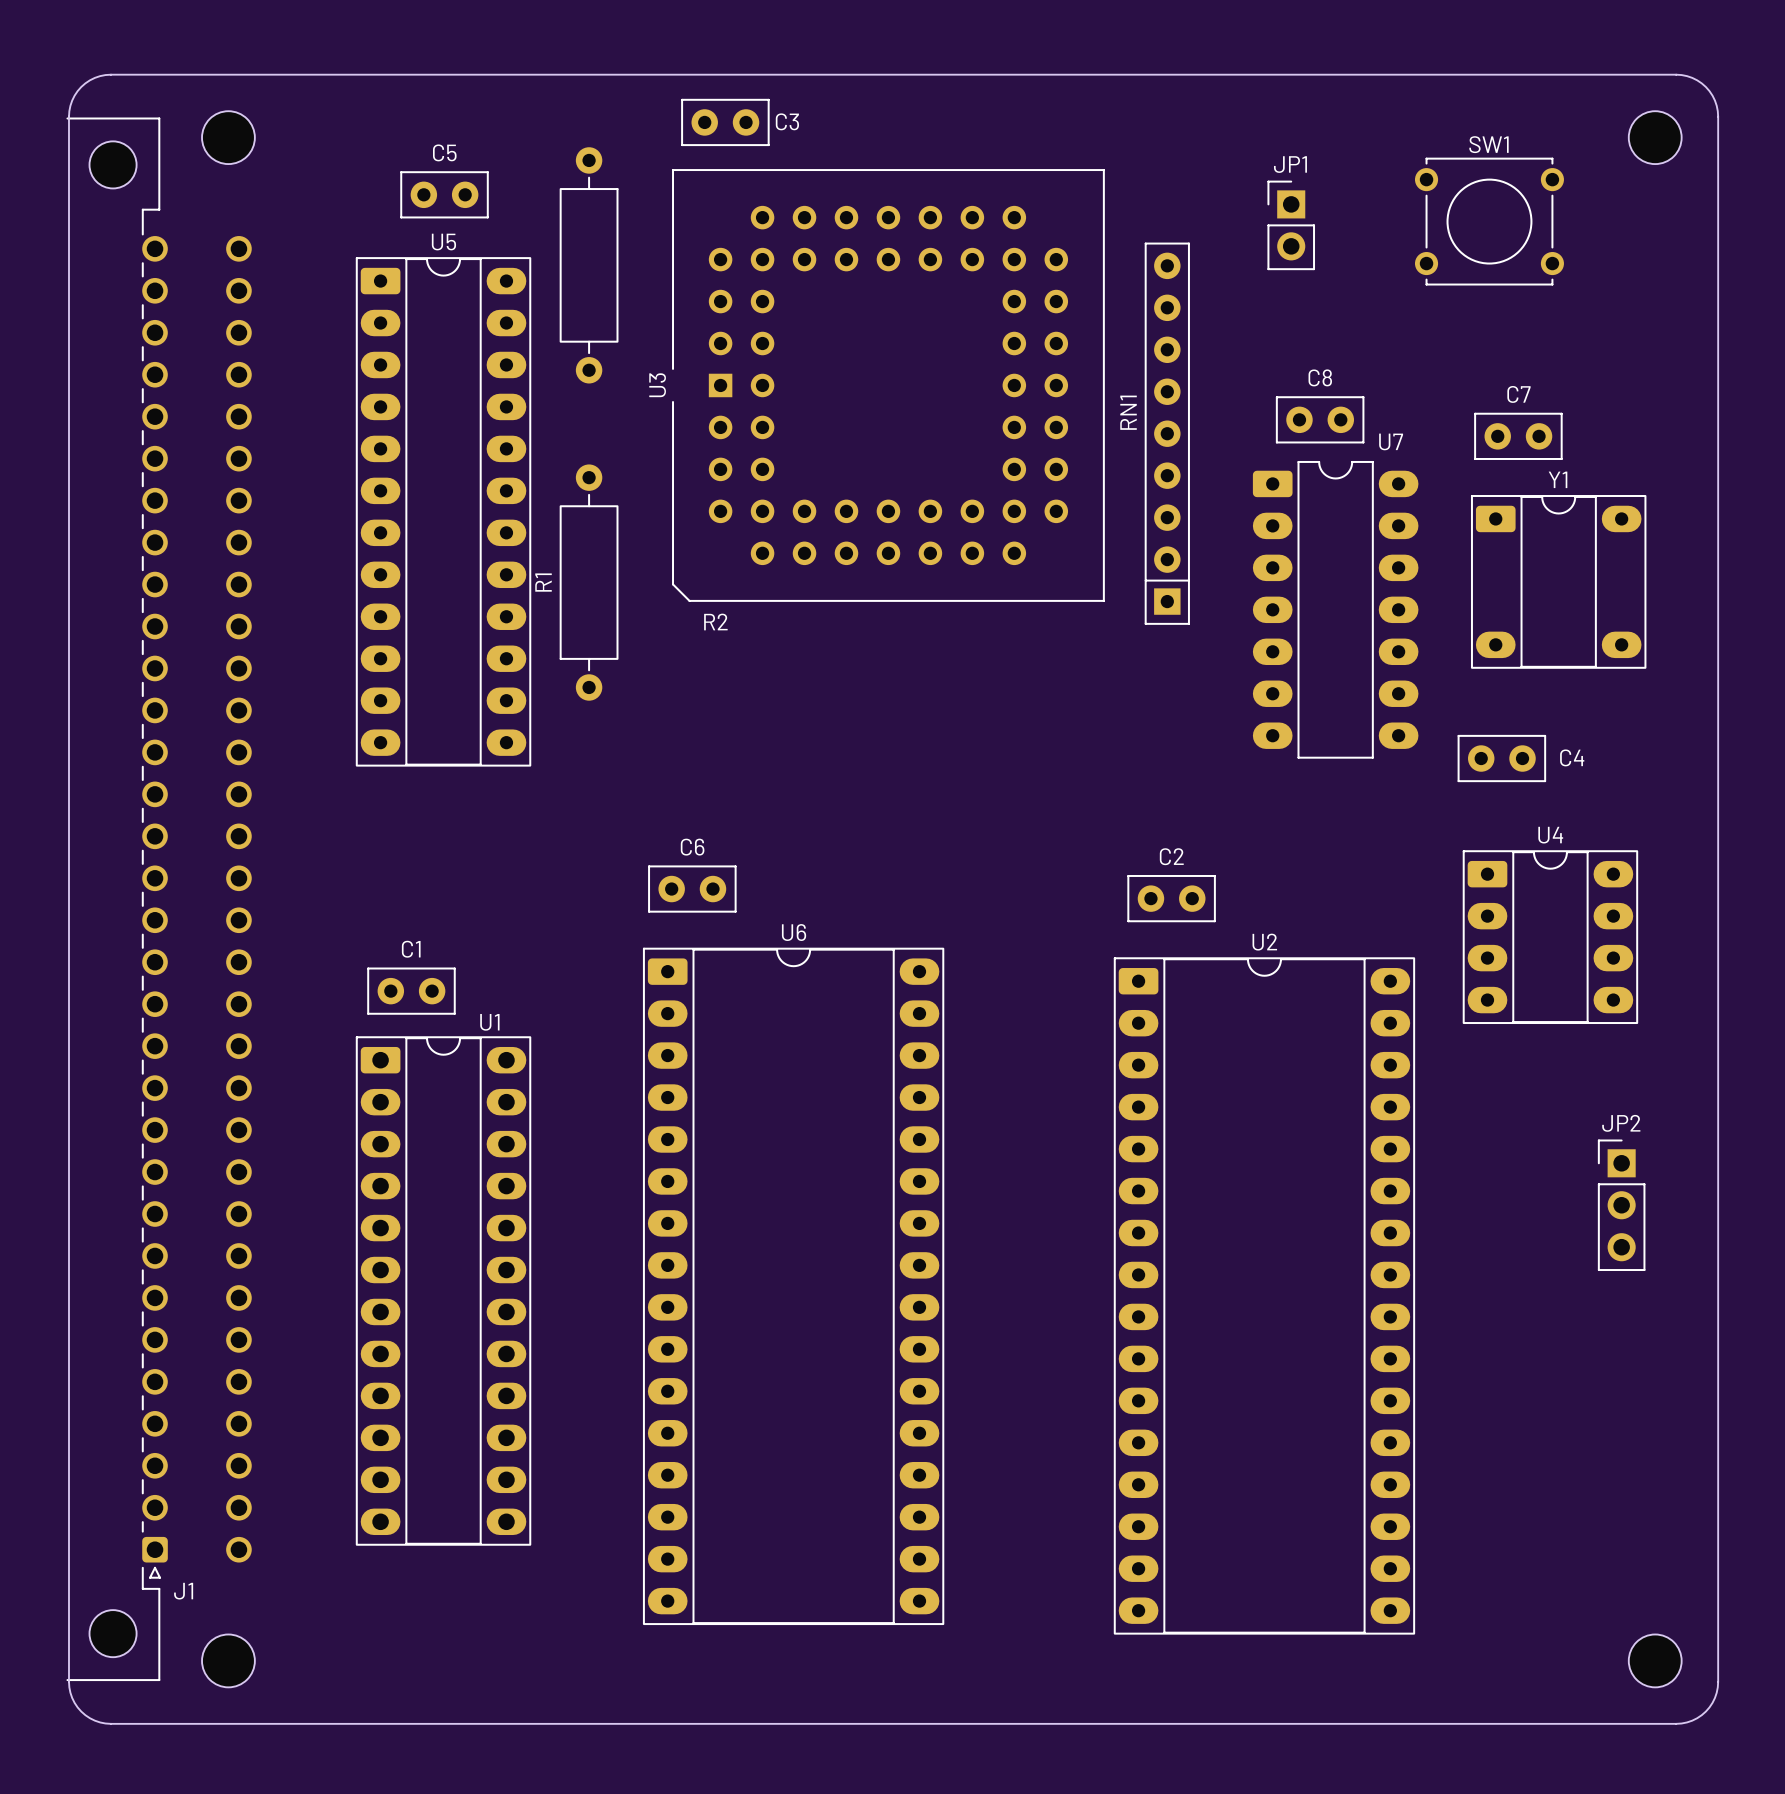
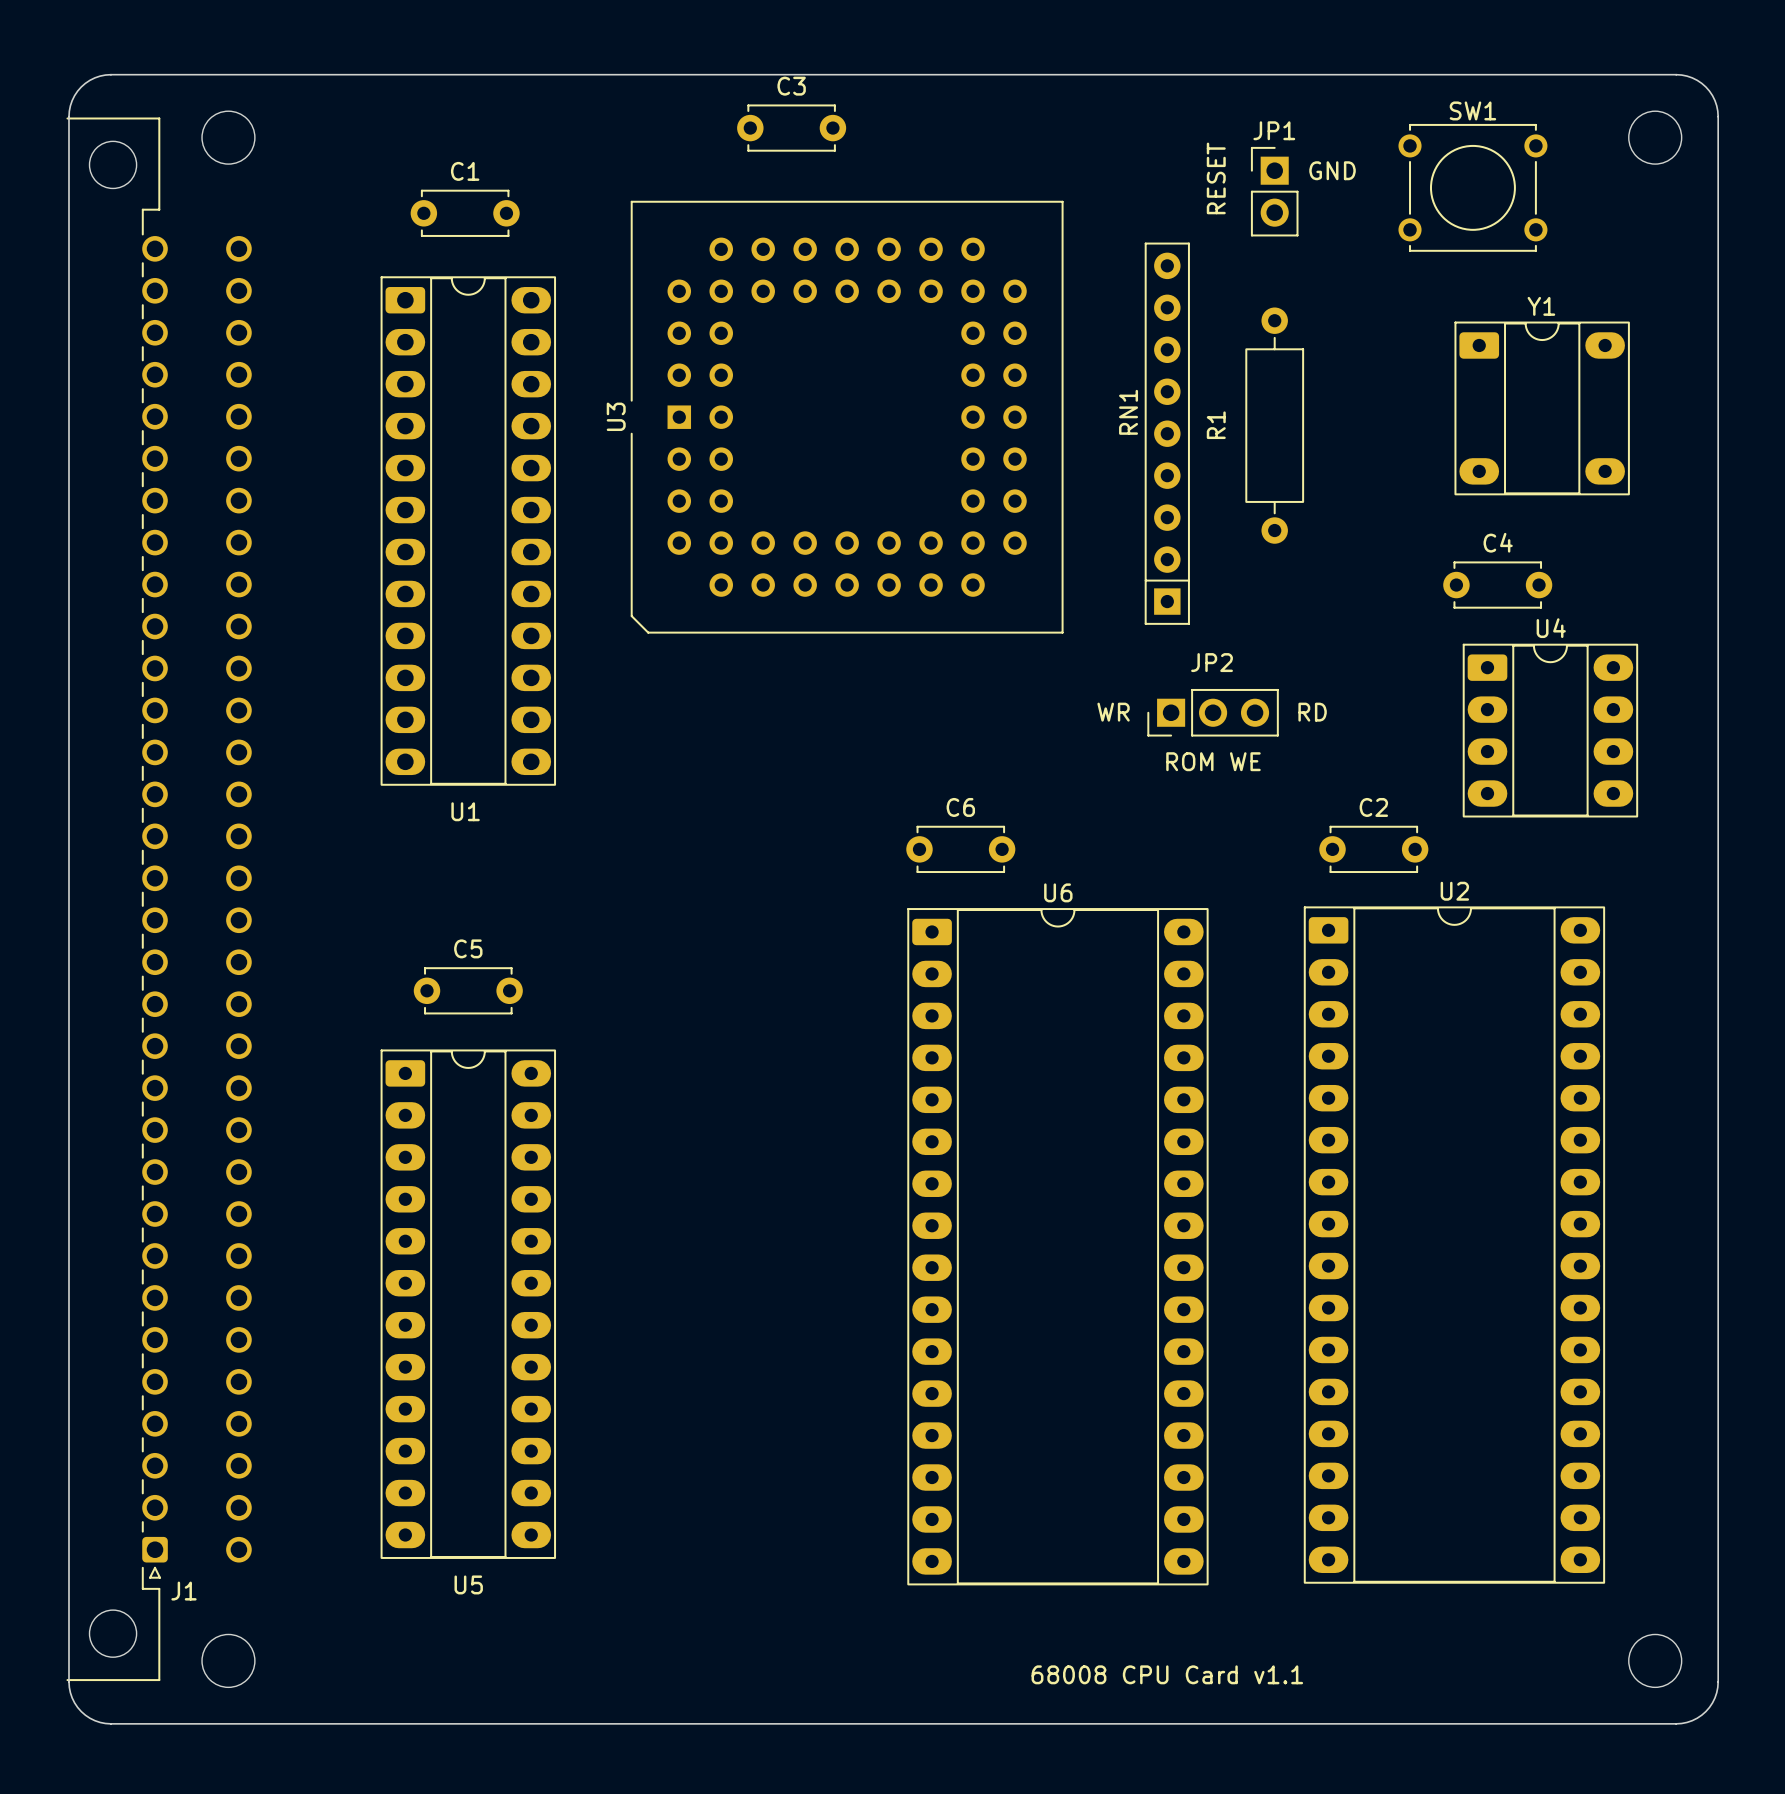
C3 footprint: [681, 98, 770, 147] -> [737, 104, 847, 152]
C3 name position: C3 (787, 121) -> C3 (791, 86)
text: none -> GND (1332, 170)
C5 footprint: [400, 171, 489, 219] -> [413, 967, 523, 1015]
text: none -> RESET (1216, 178)
SW1 position: (1489, 221) -> (1472, 187)
JP1 position: (1291, 225) -> (1274, 191)
U5 name position: U5 (443, 242) -> U5 (468, 1584)
R2: (589, 265) -> none
U3 position: (888, 385) -> (847, 417)
C8: (1320, 419) -> none
C7: (1518, 436) -> none
U5 position: (443, 511) -> (468, 1304)
Y1 position: (1558, 581) -> (1542, 408)
R1 name position: R1 (543, 582) -> R1 (1216, 425)
R1 position: (589, 582) -> (1274, 425)
U7: (1335, 609) -> none
text: none -> WR (1113, 712)
text: none -> RD (1312, 712)
C4 footprint: [1457, 734, 1547, 783] -> [1443, 561, 1553, 609]
C4 name position: C4 (1572, 757) -> C4 (1498, 542)
text: none -> ROM WE (1213, 761)
C6 footprint: [648, 865, 737, 913] -> [906, 825, 1016, 874]
C2 footprint: [1127, 874, 1216, 923] -> [1319, 825, 1429, 874]
U4 position: (1550, 937) -> (1550, 730)
C1 footprint: [367, 967, 456, 1015] -> [410, 189, 520, 237]
U1 name position: U1 (489, 1022) -> U1 (465, 811)
JP2 rotation: 0° (1621, 1205) -> 90° counterclockwise (1213, 712)
JP2 position: (1621, 1205) -> (1213, 712)
U6 position: (793, 1286) -> (1057, 1246)
U1 position: (443, 1290) -> (468, 531)
U2 position: (1264, 1295) -> (1454, 1245)
text: none -> 68008 CPU Card v1.1 (1167, 1674)

